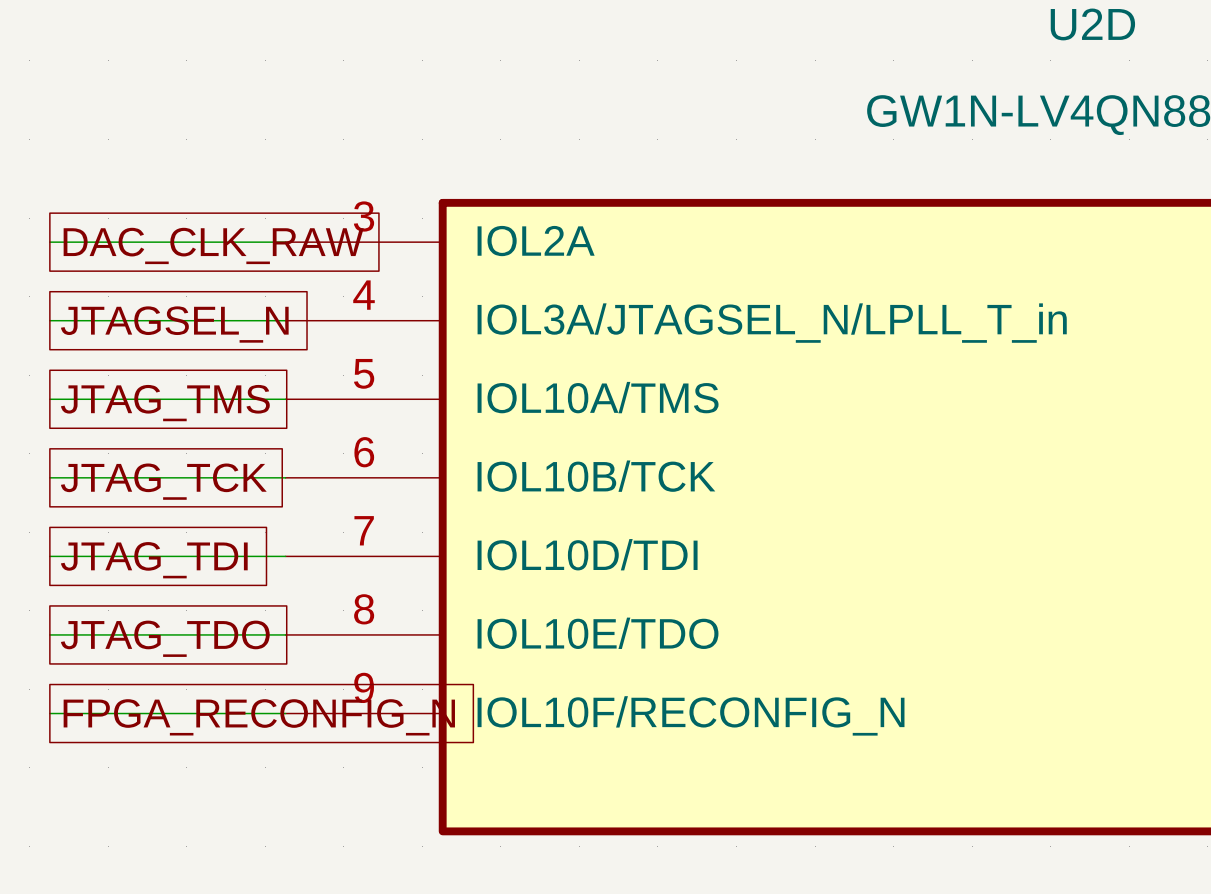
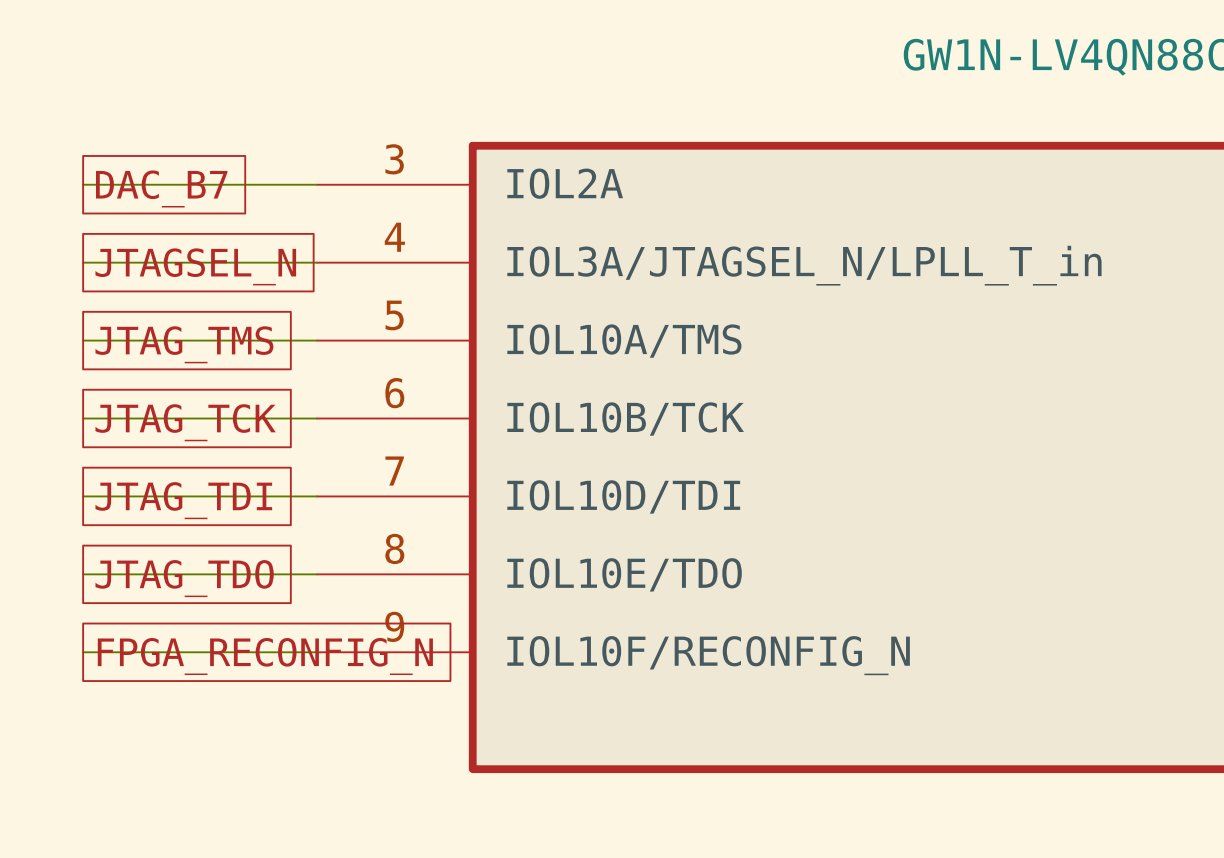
global label: DAC_CLK_RAW (213, 245) -> DAC_B7 (161, 188)

